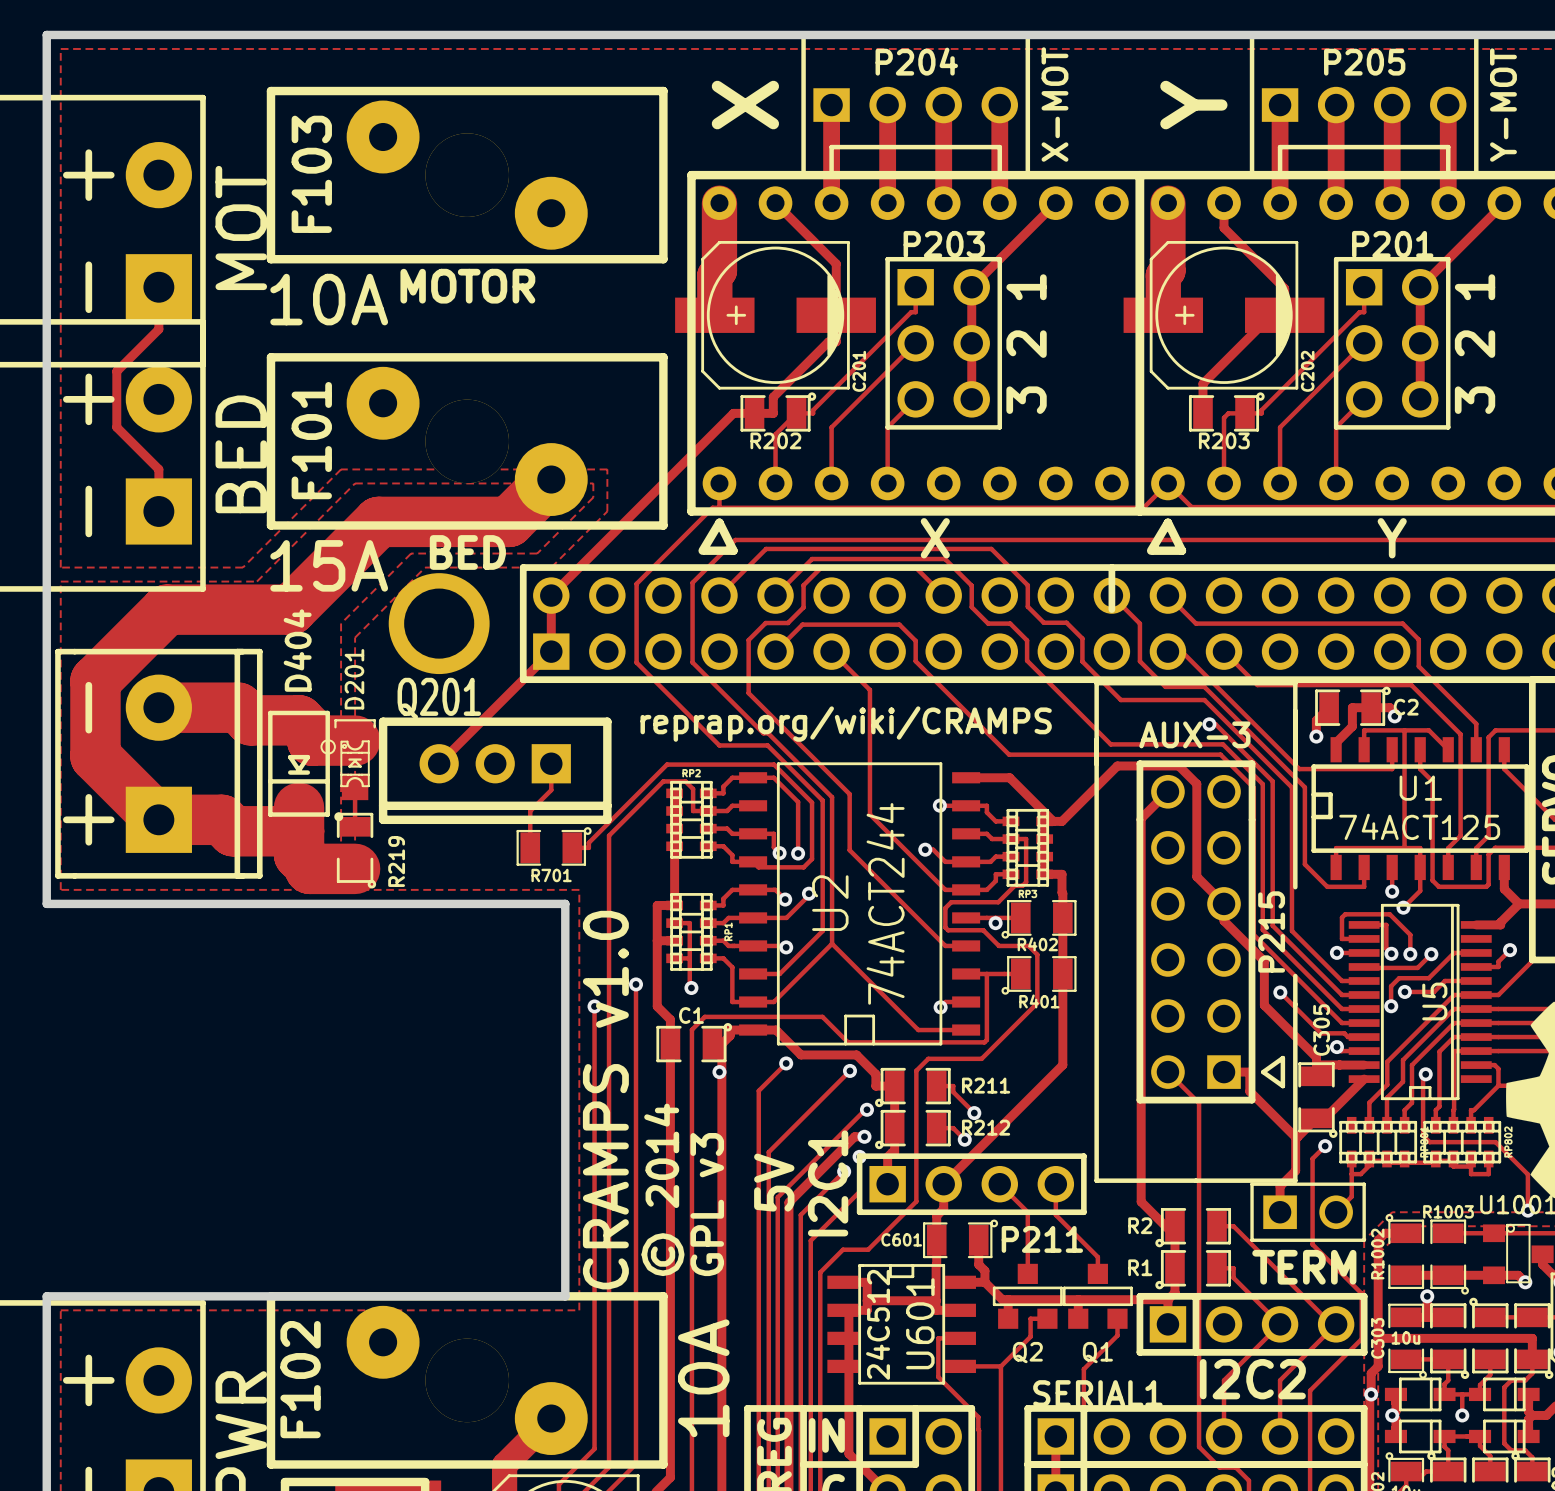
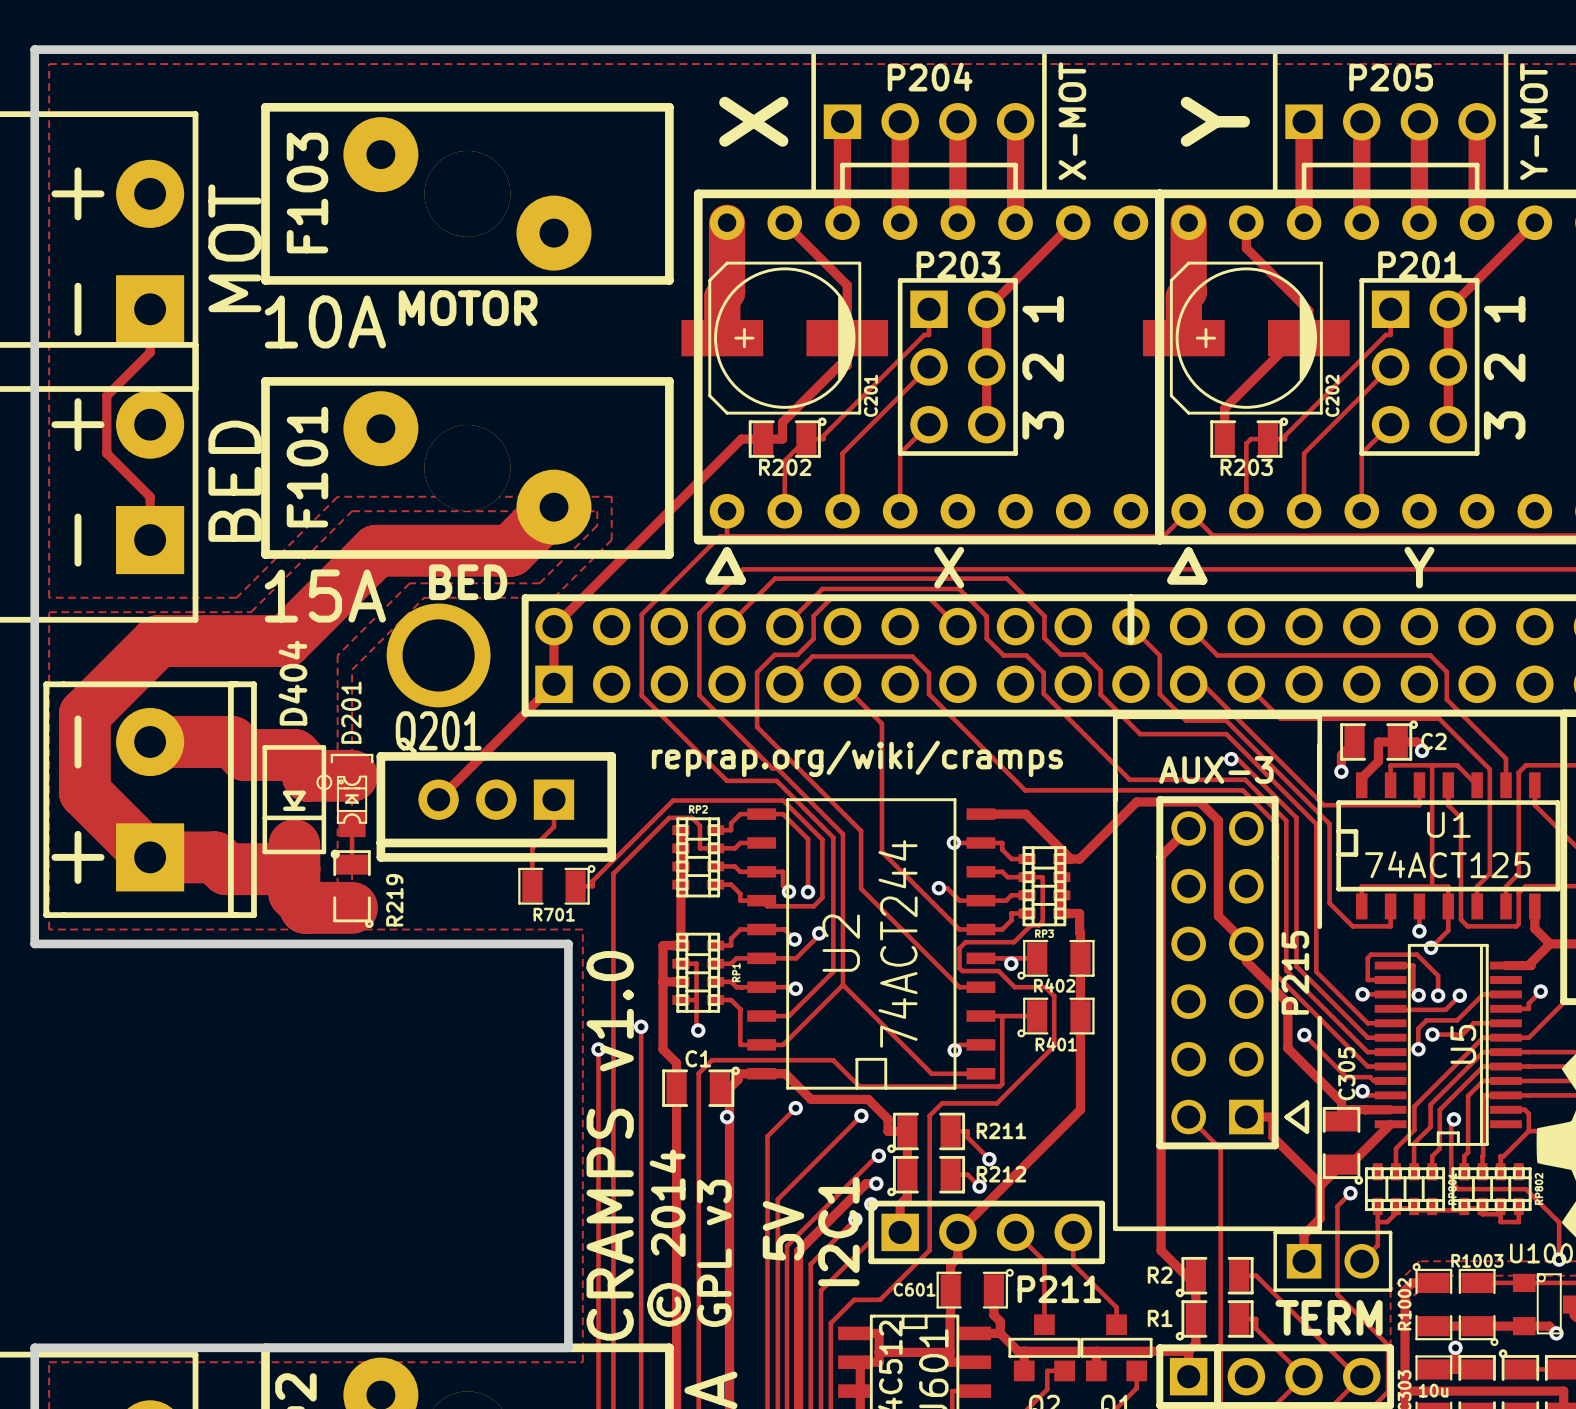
text: reprap.org/wiki/CRAMPS (846, 724) -> reprap.org/wiki/cramps (857, 758)

